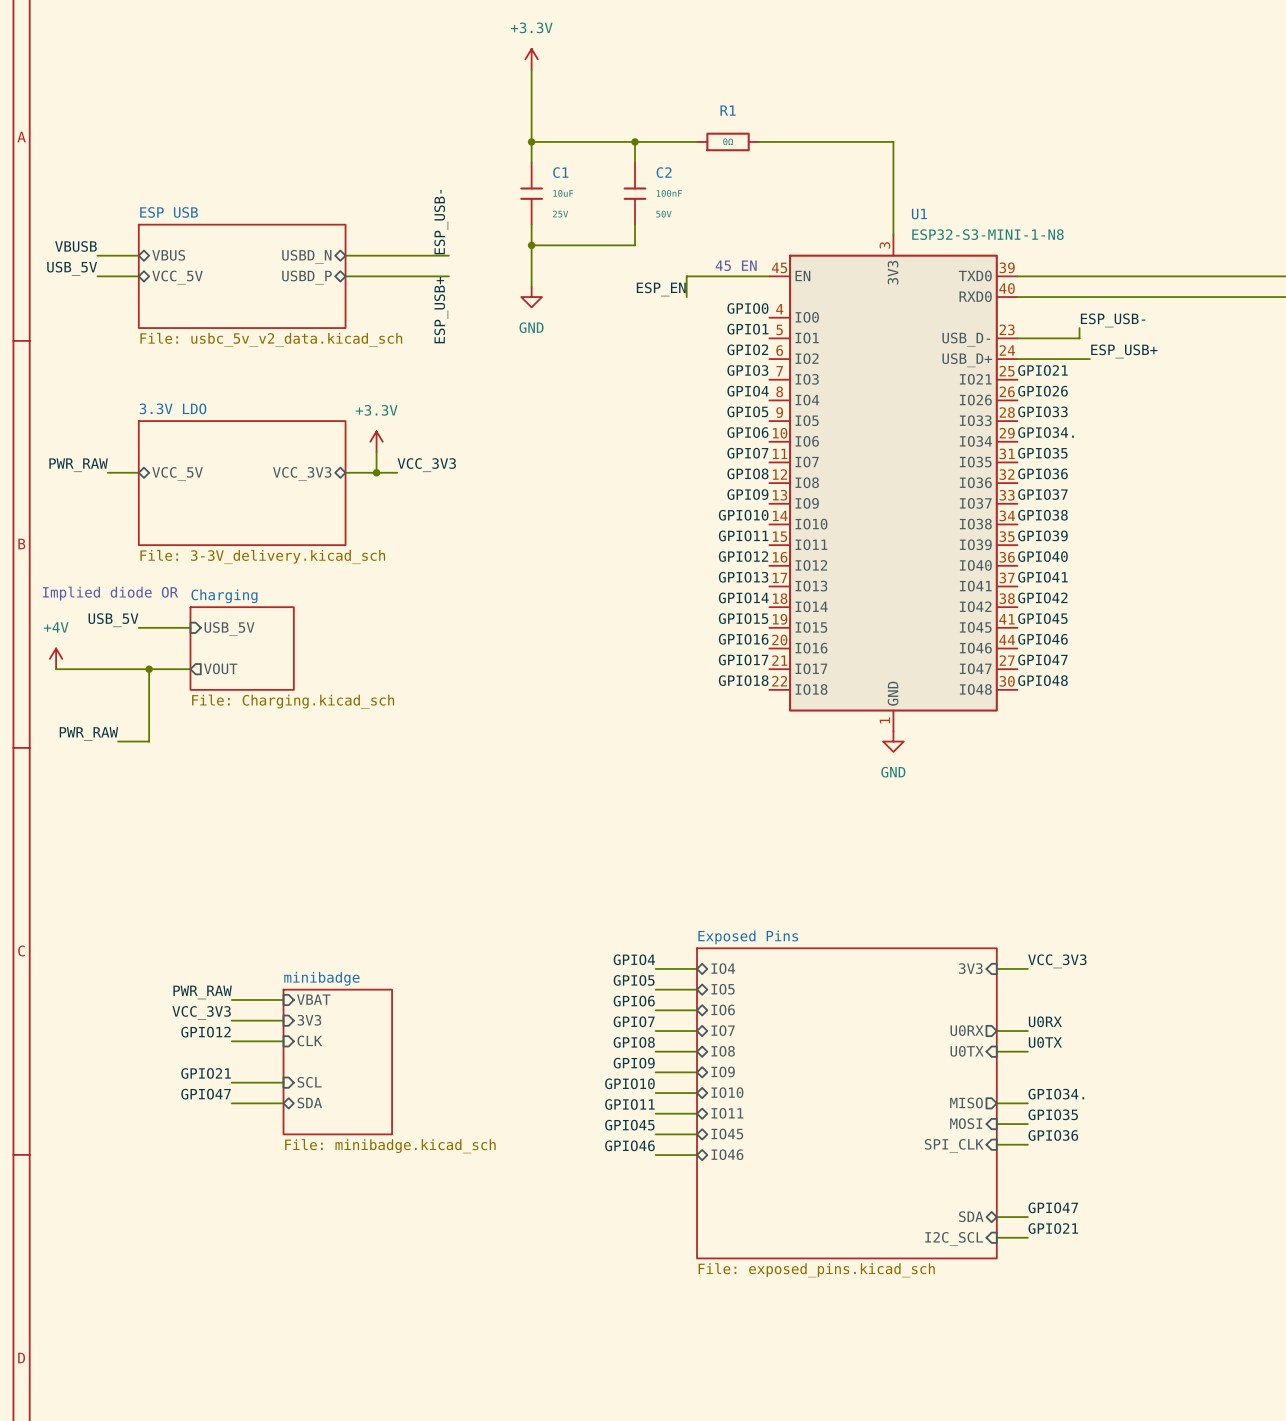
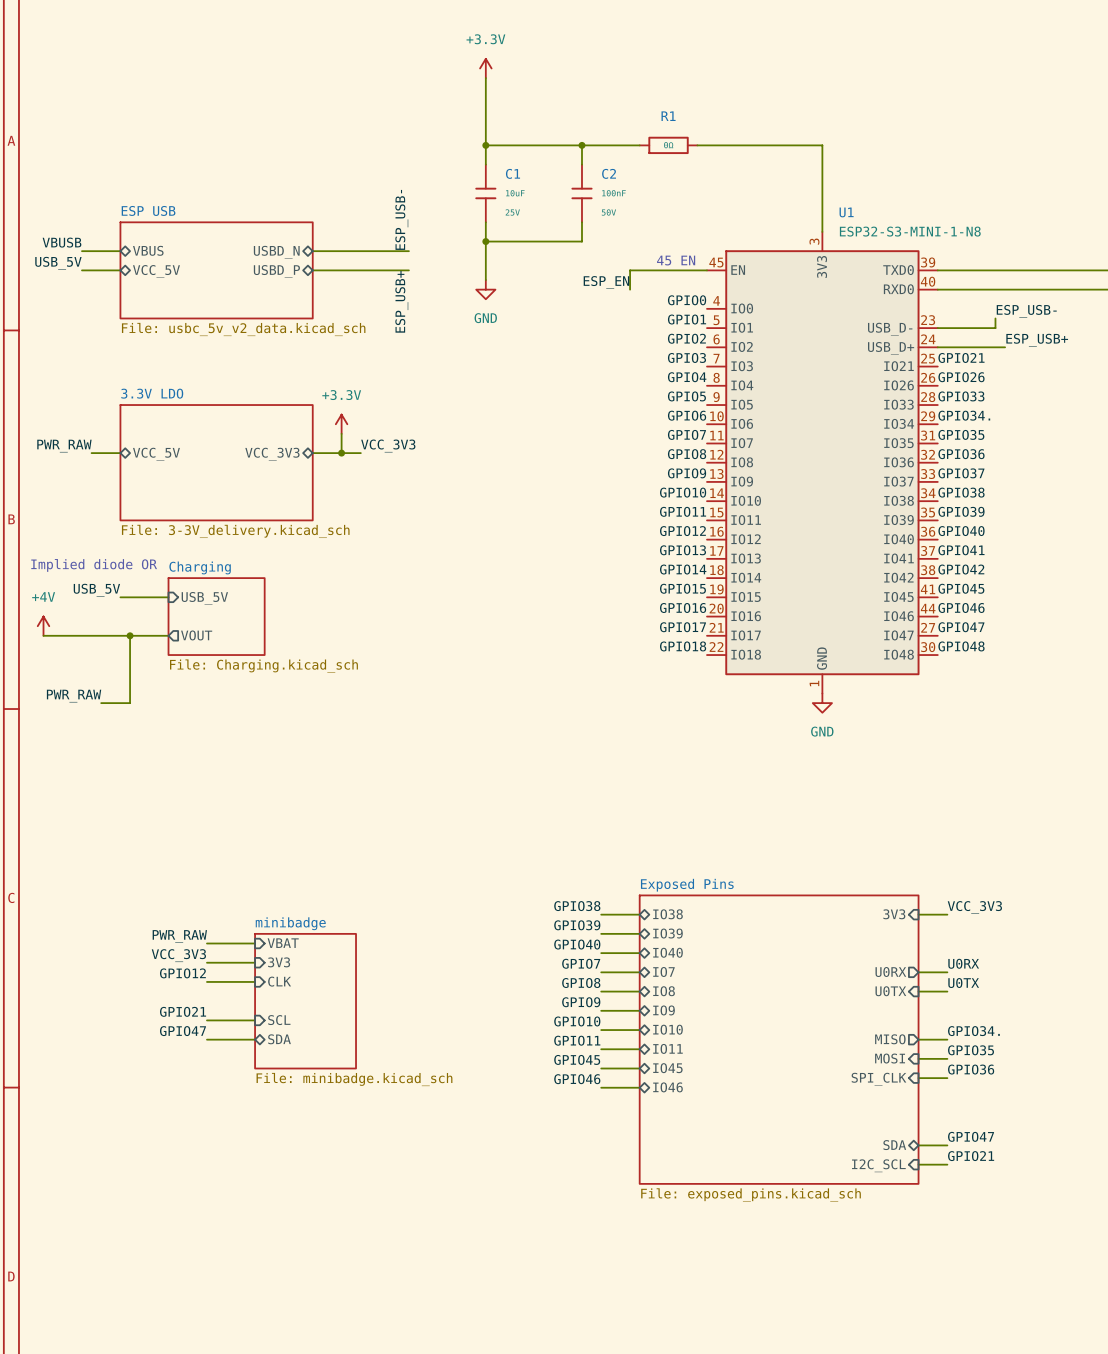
label: GPIO4 (634, 959) -> GPIO38 (577, 906)
sheet pin: IO4 (723, 968) -> IO38 (668, 914)
label: GPIO5 (634, 980) -> GPIO39 (577, 925)
sheet pin: IO5 (723, 989) -> IO39 (667, 933)
label: GPIO6 (634, 1001) -> GPIO40 (577, 944)
sheet pin: IO6 (723, 1009) -> IO40 (668, 952)

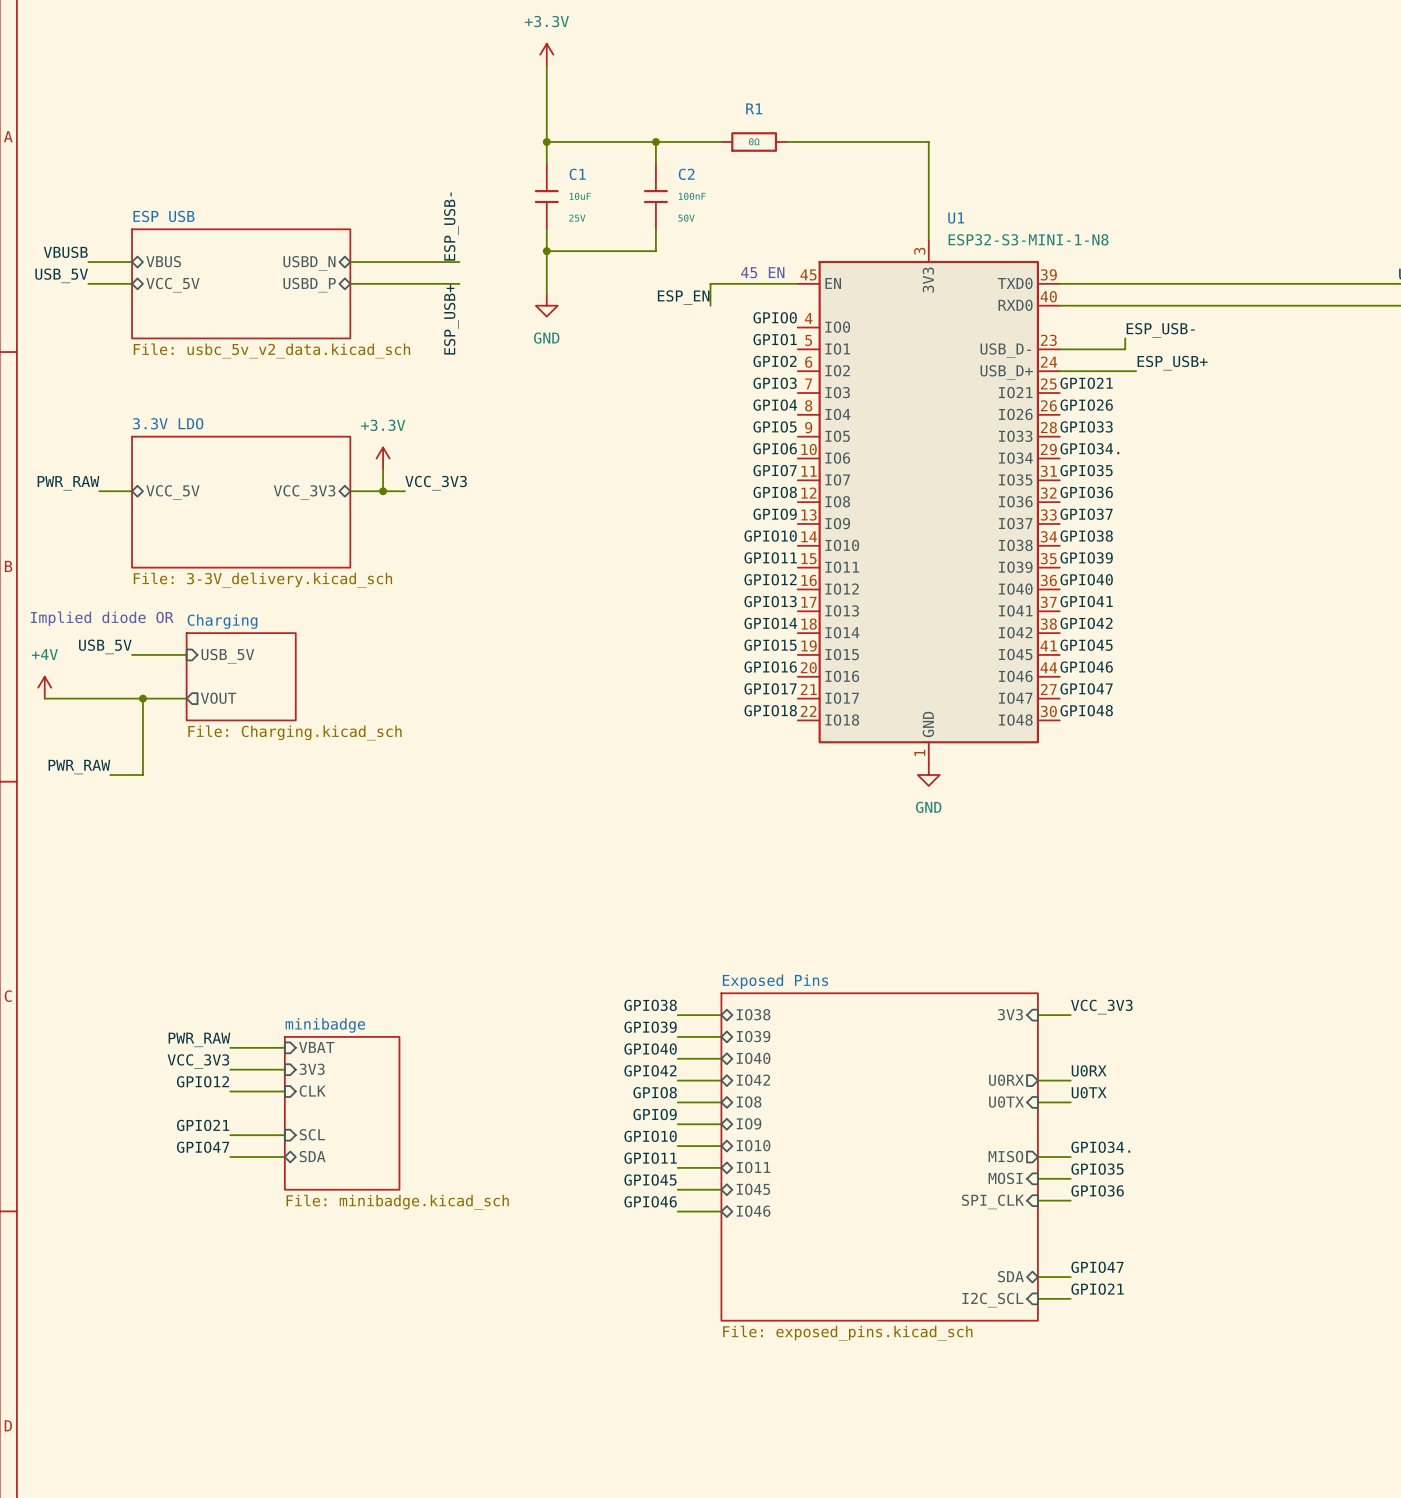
label: GPIO7 (581, 963) -> GPIO42 (650, 1070)
sheet pin: IO7 (663, 971) -> IO42 (753, 1080)

